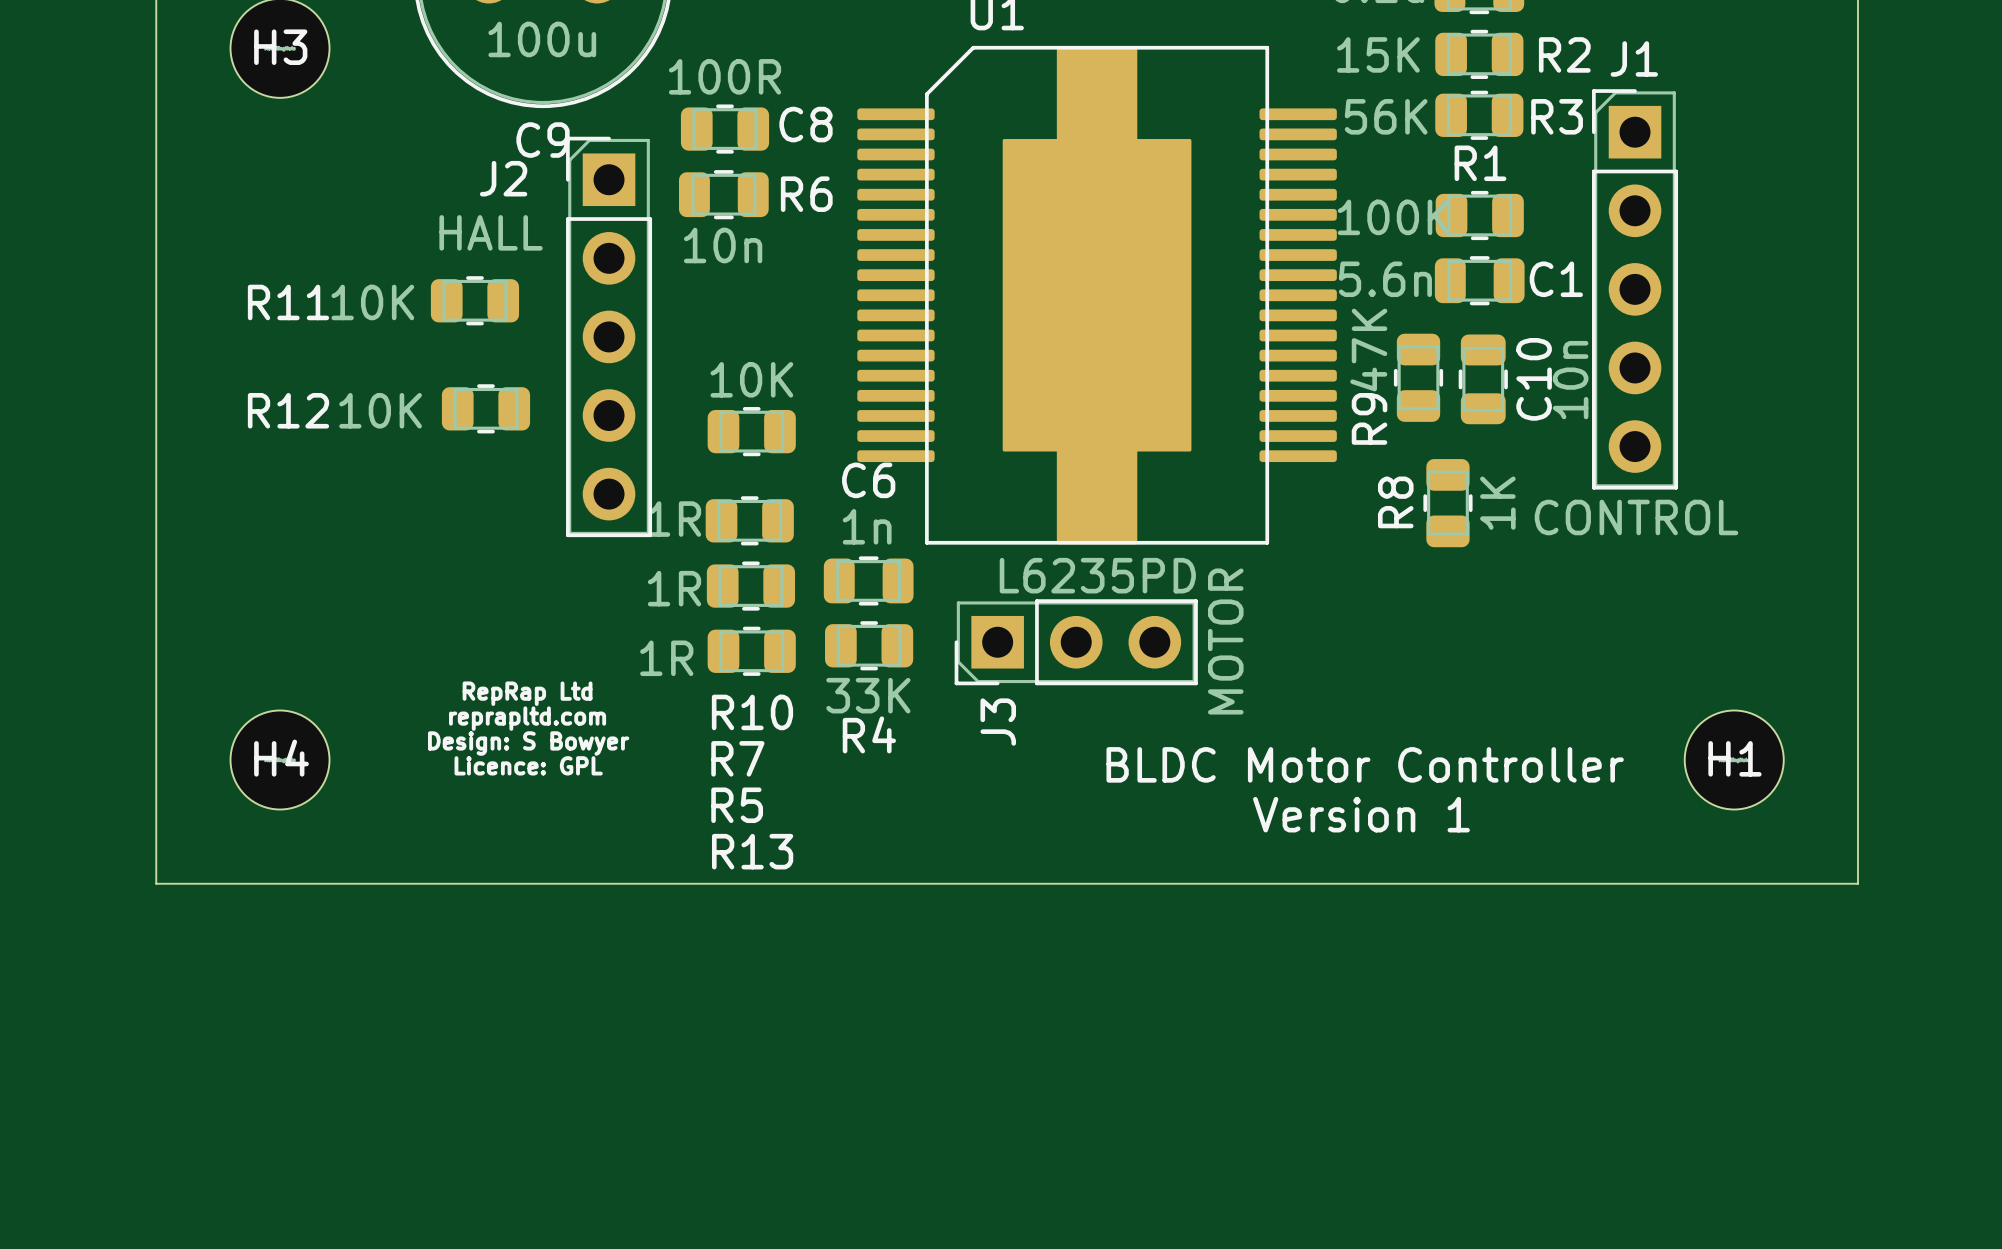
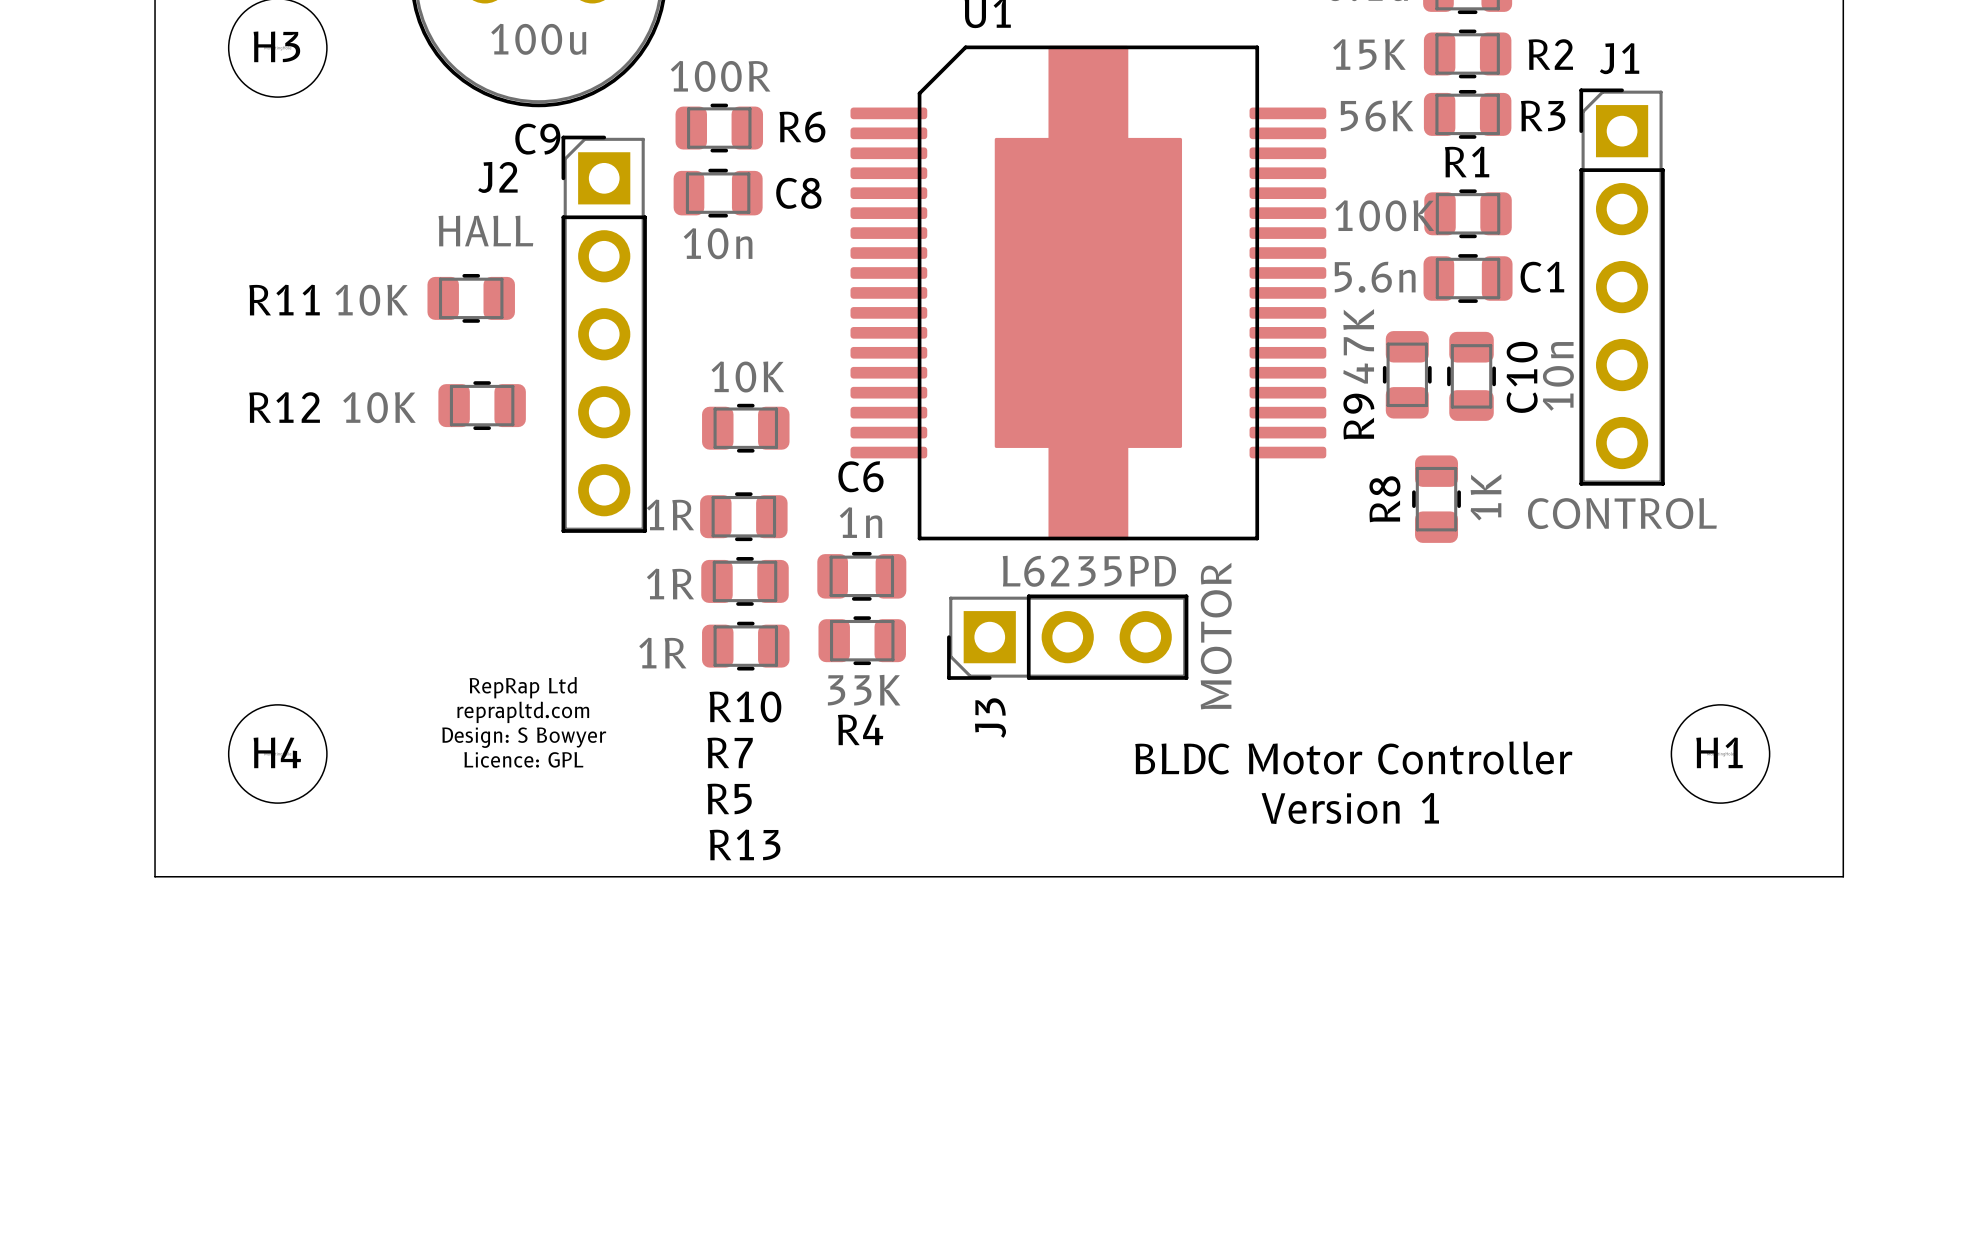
C8 name position: C8 (806, 124) -> C8 (798, 193)
R6 name position: R6 (806, 194) -> R6 (802, 127)

